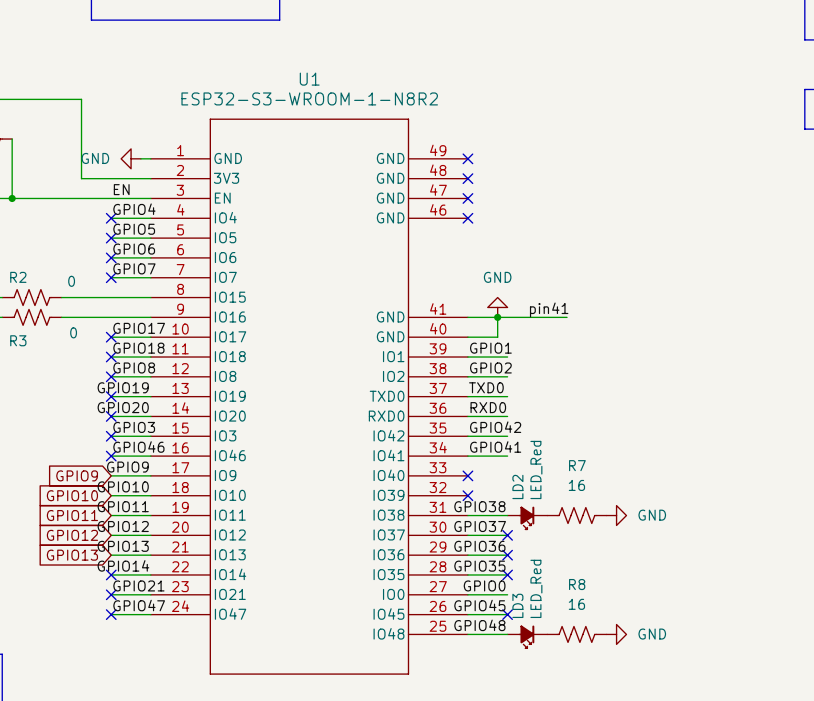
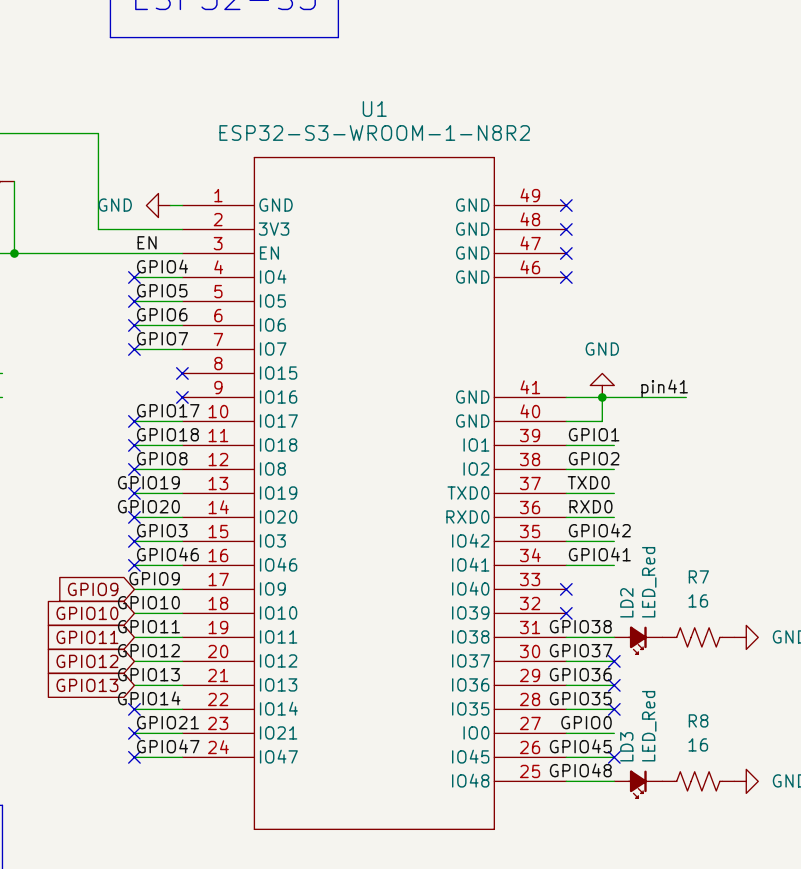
R2: 0 (31, 297) -> none
wire: (61, 297) (150, 297) -> none
no-connect mark: none -> (182, 373)
R3: 0 (31, 317) -> none
wire: (61, 317) (150, 317) -> none
no-connect mark: none -> (182, 397)

